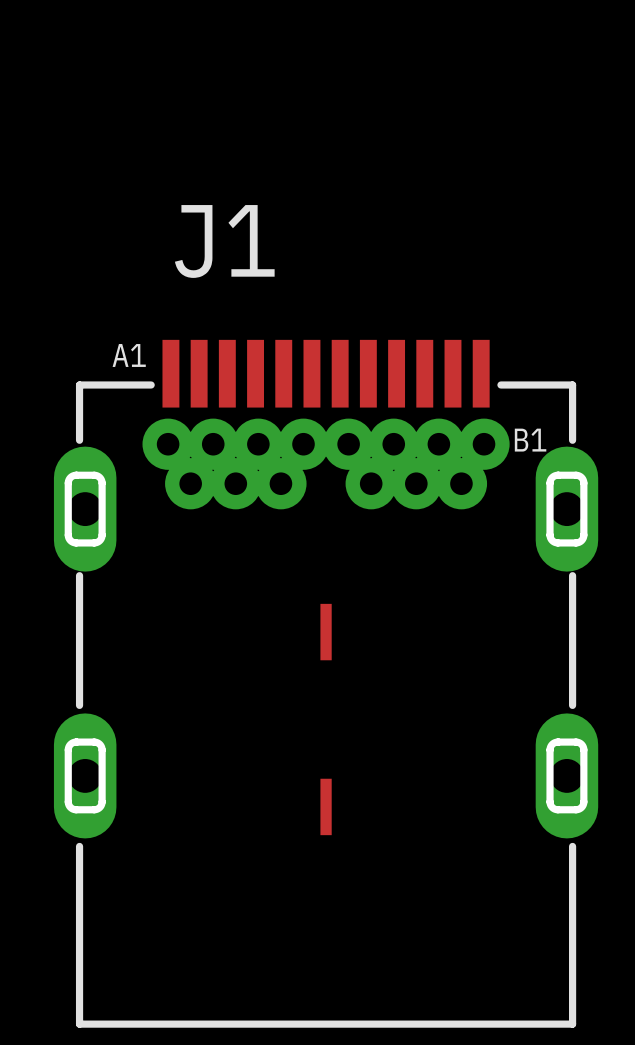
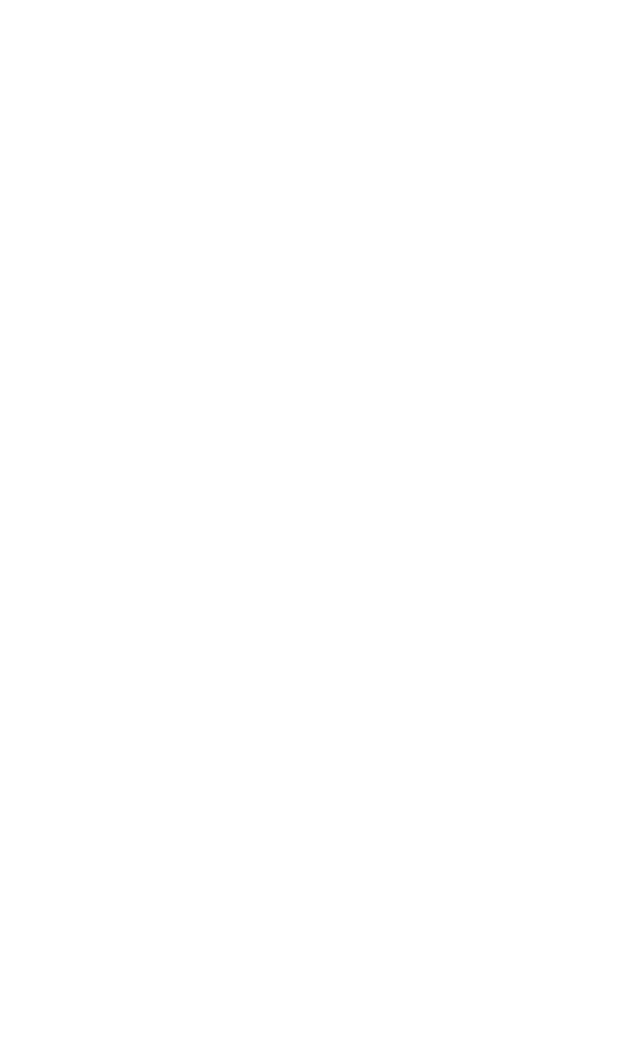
J1: (326, 683) -> none

